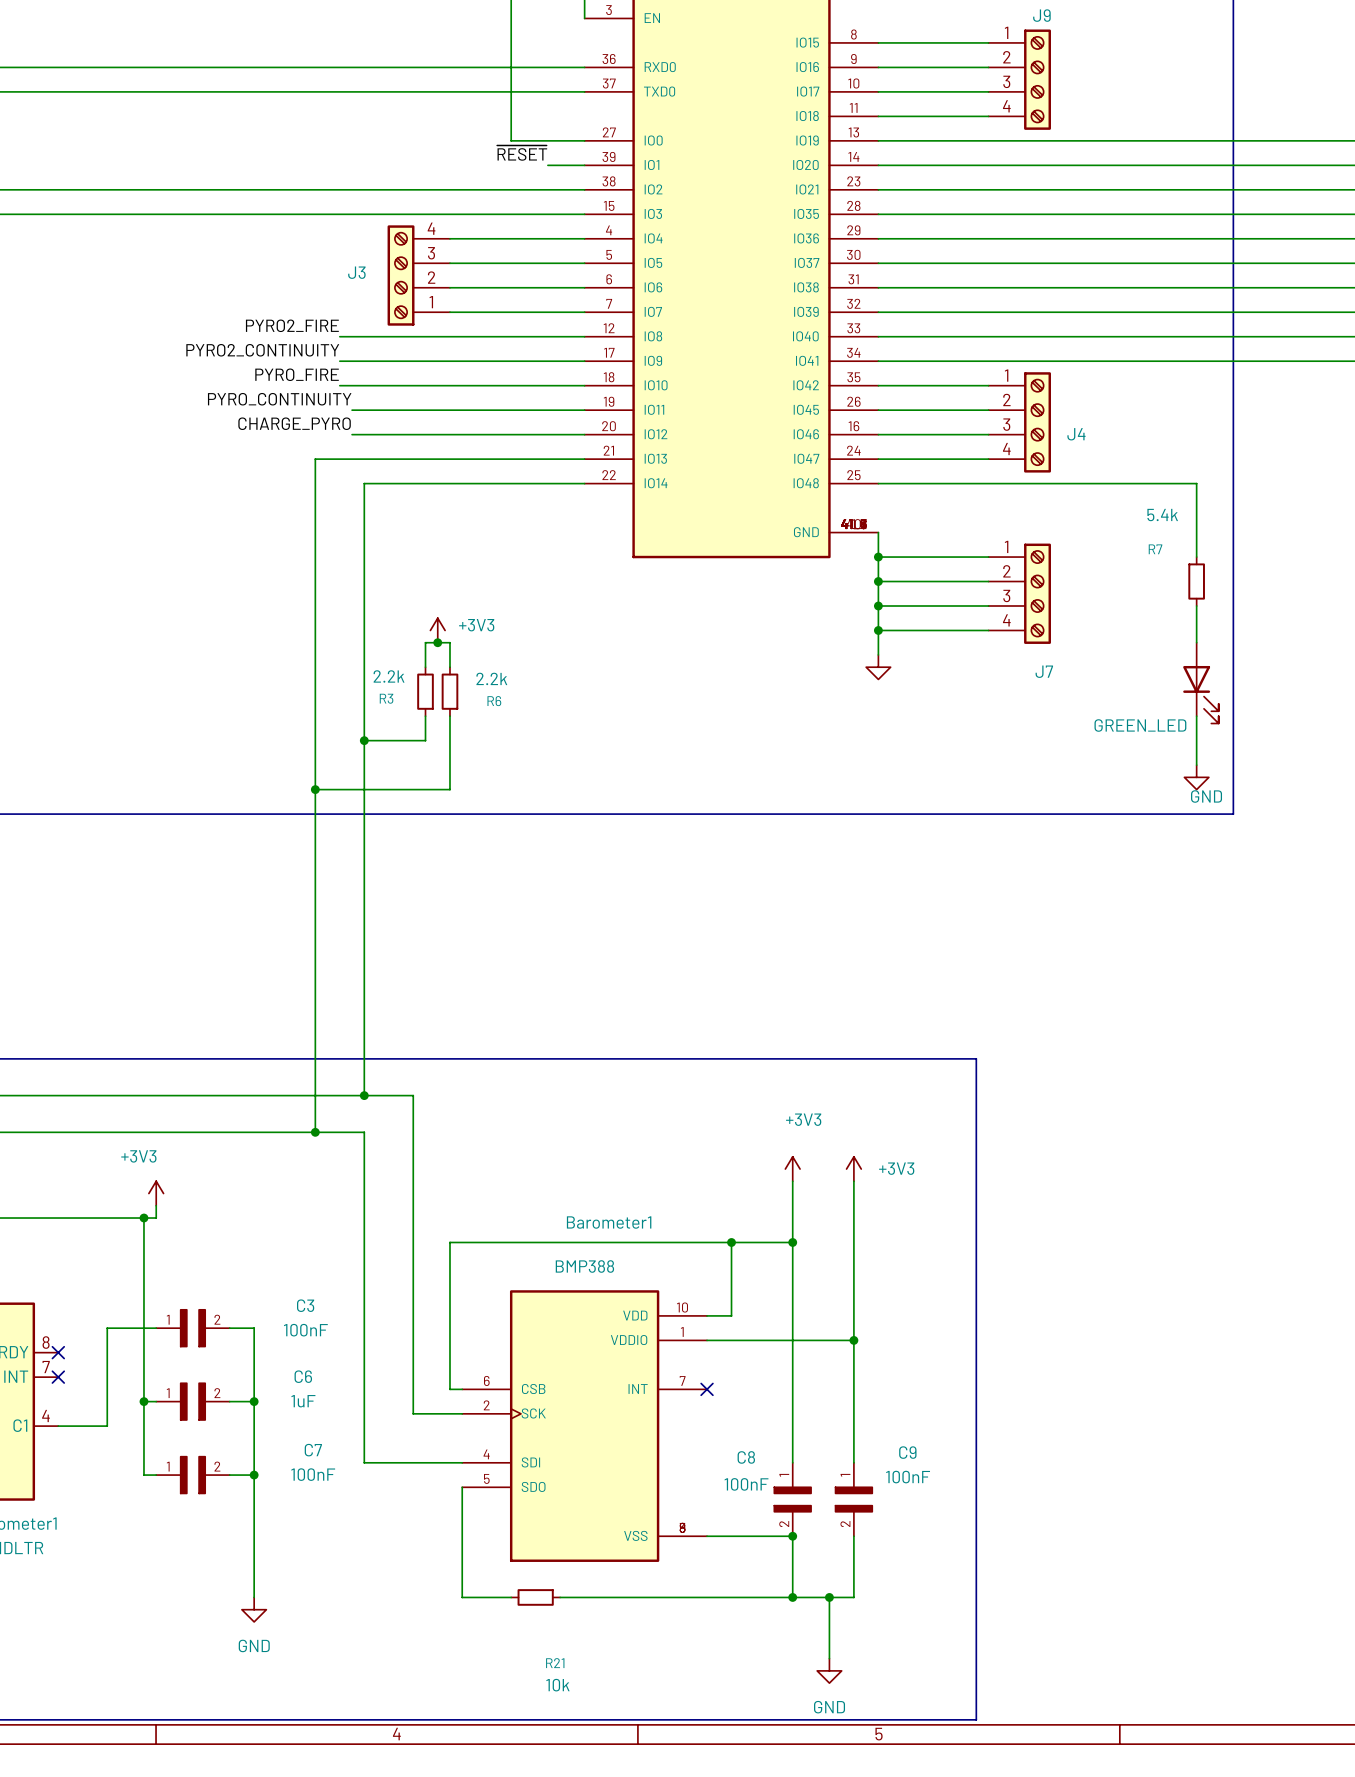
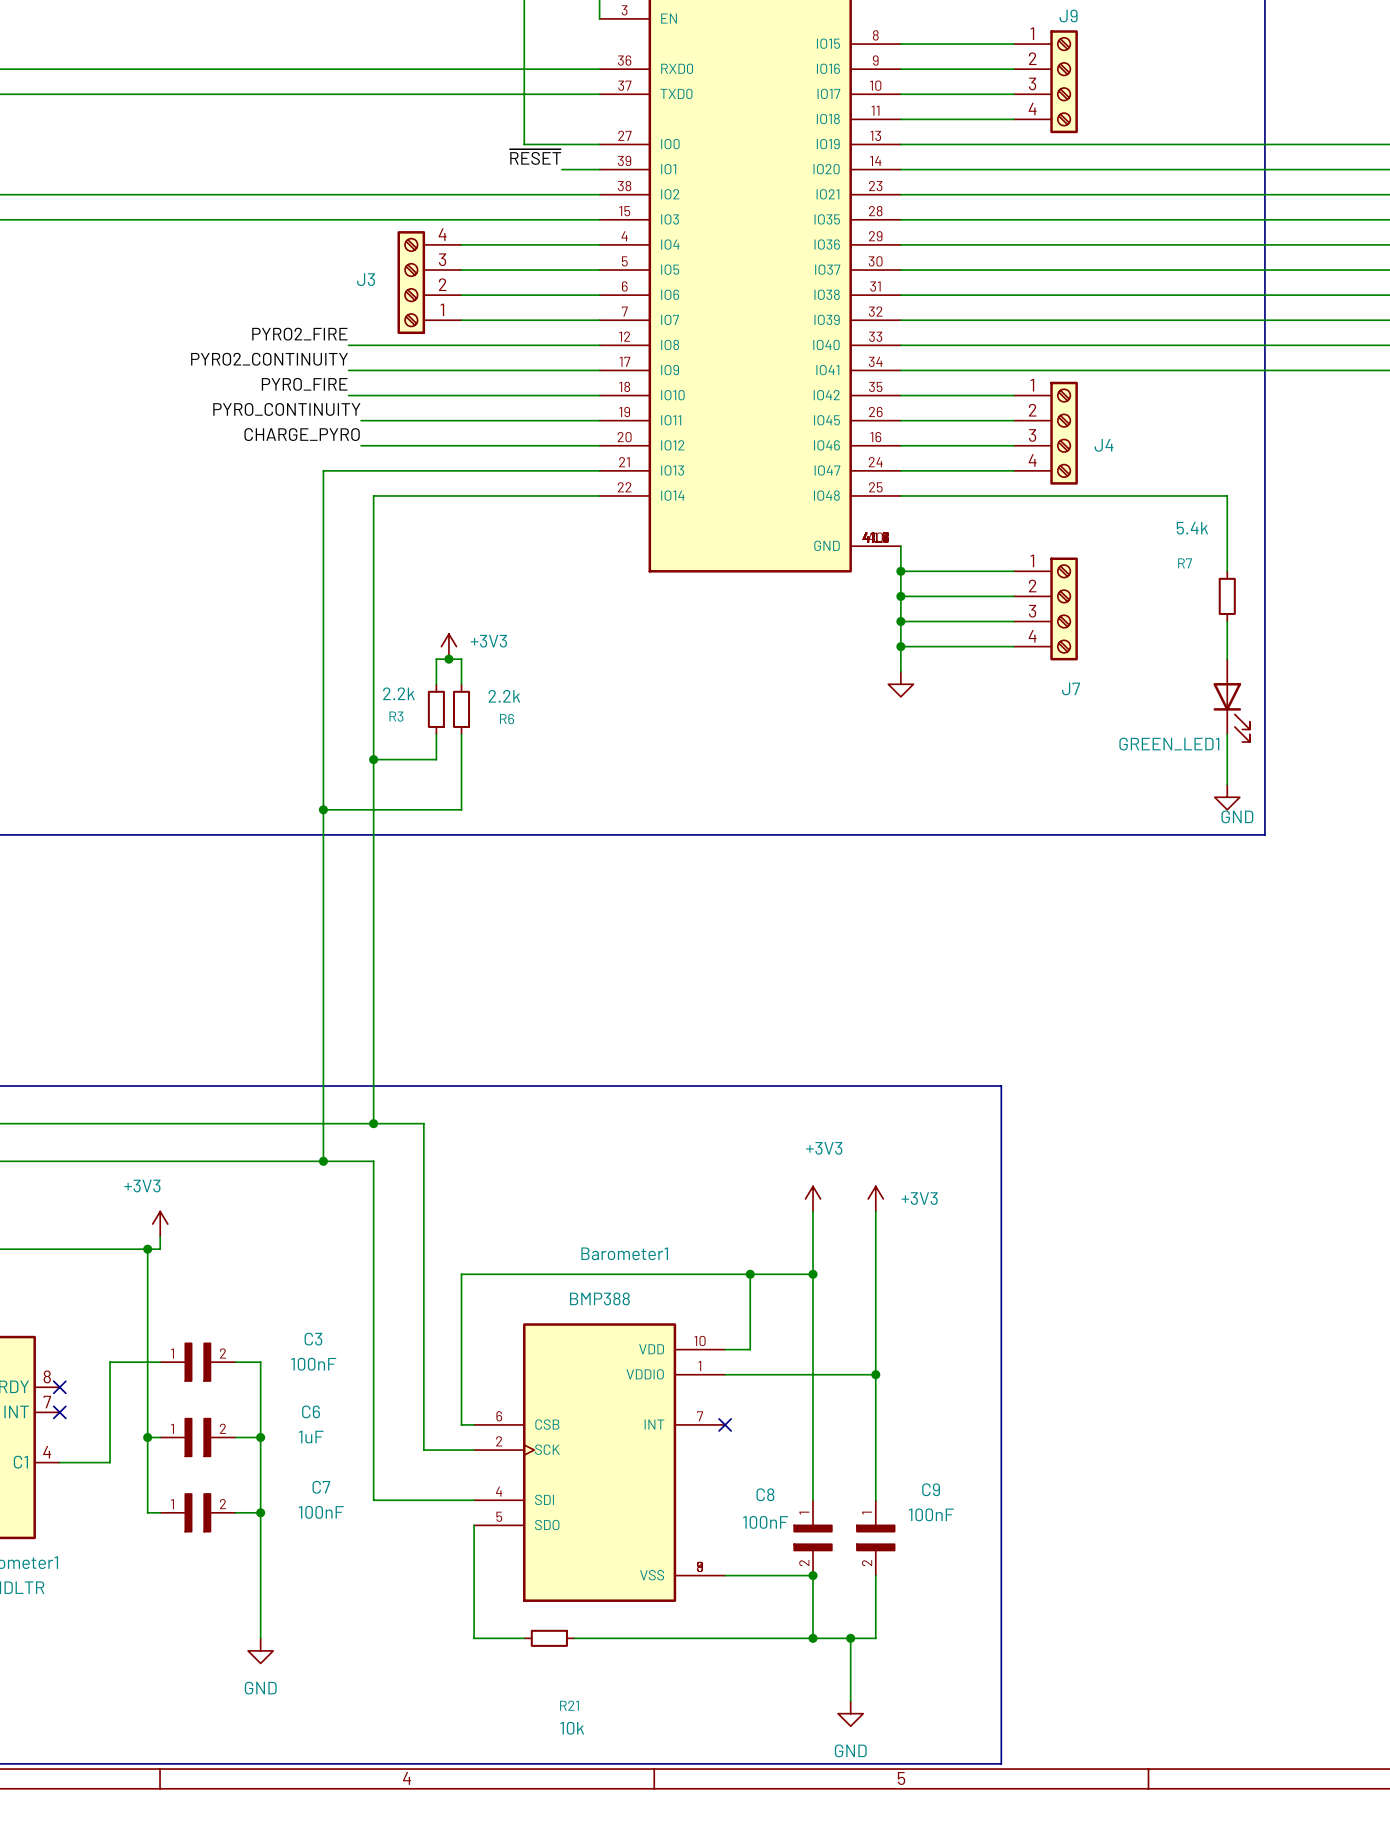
GREEN_LED name: GREEN_LED (1140, 725) -> GREEN_LED1 (1169, 744)

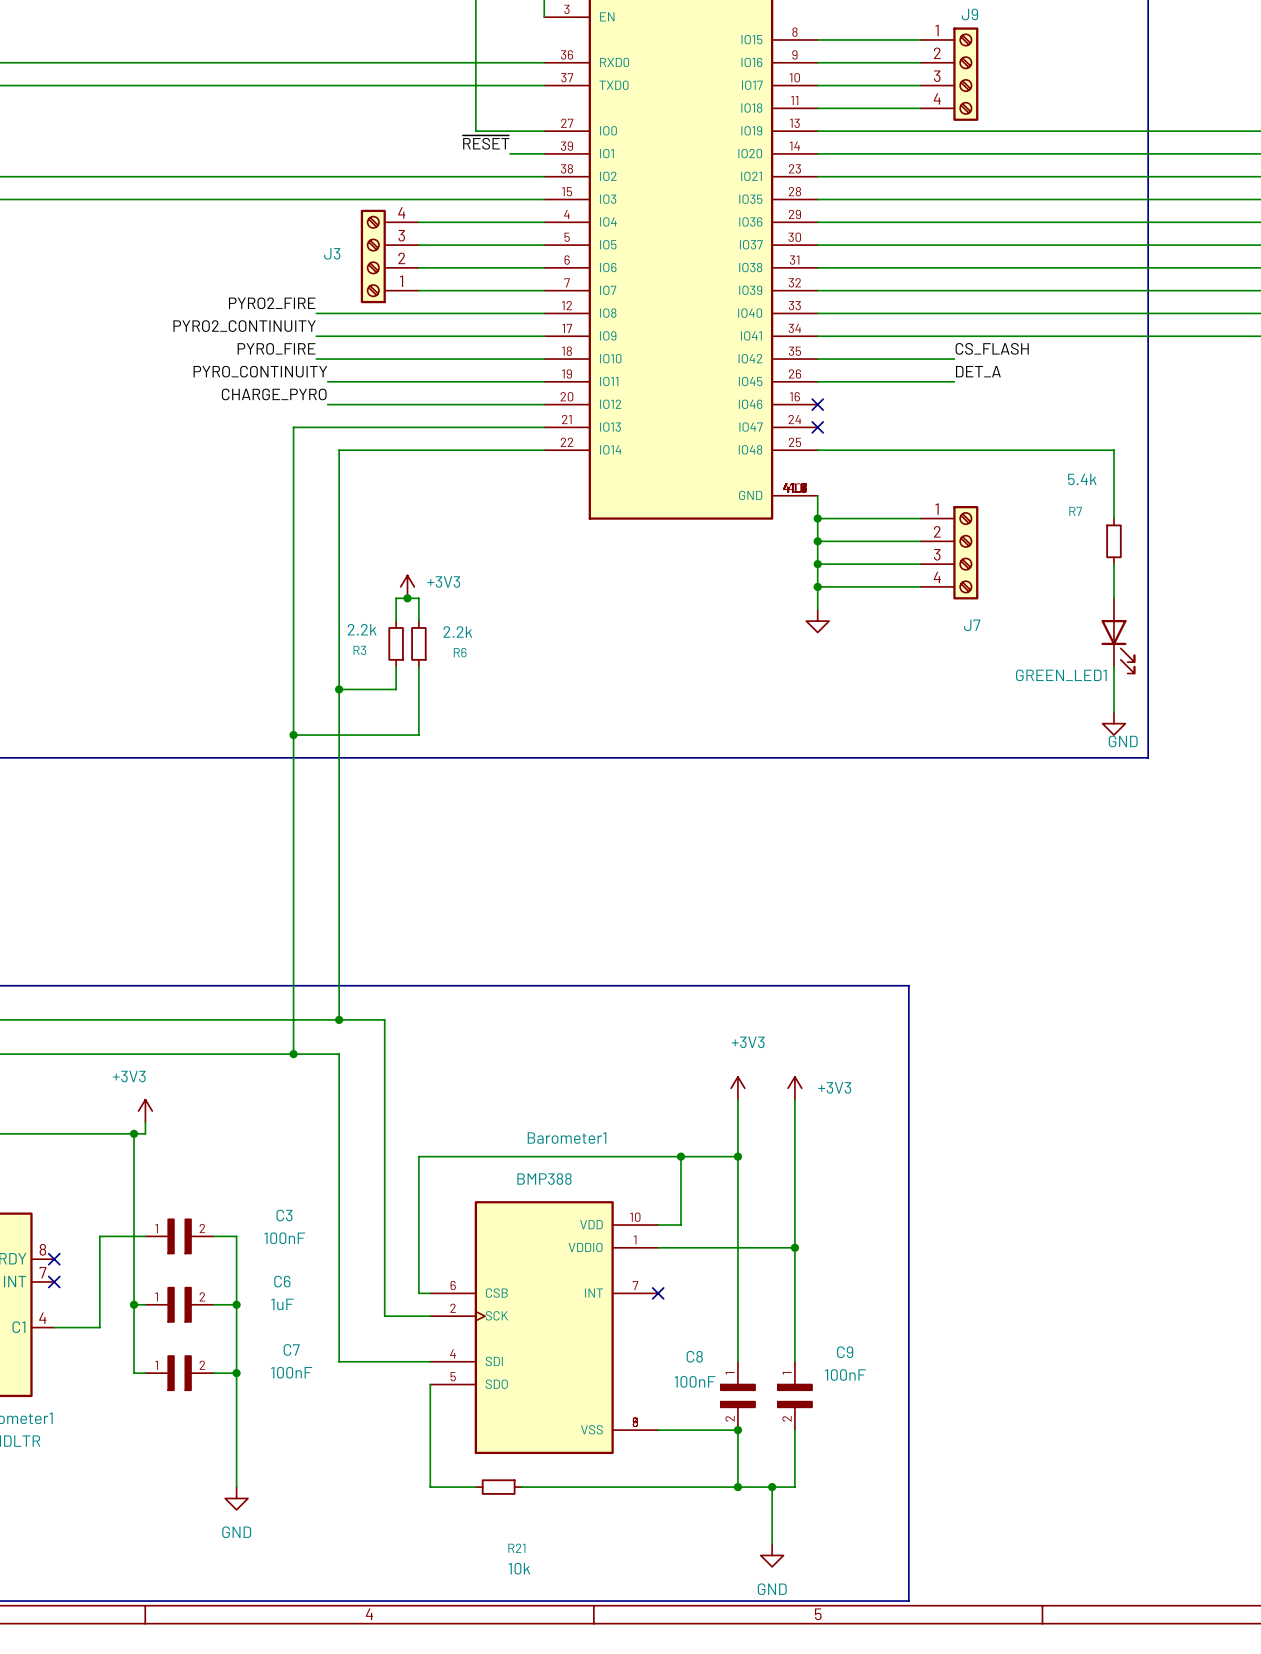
label: none -> CS_FLASH (992, 348)
label: none -> DET_A (978, 371)
J4: (1045, 433) -> none
wire: (900, 445) (1013, 445) -> none
no-connect mark: none -> (817, 404)
wire: (900, 470) (1013, 470) -> none
no-connect mark: none -> (817, 427)

